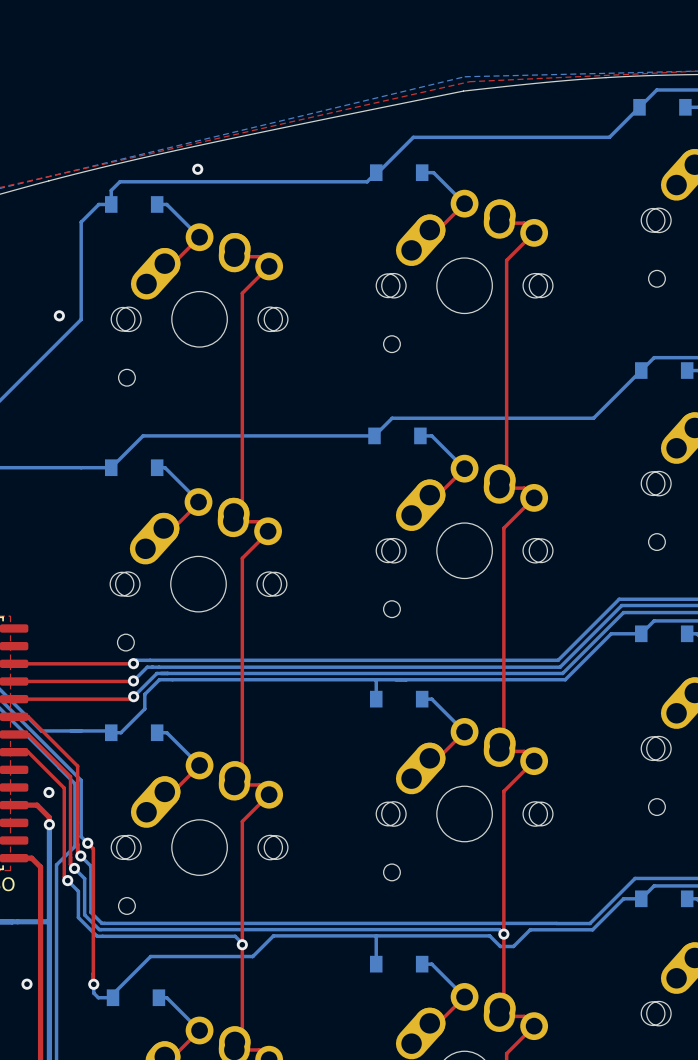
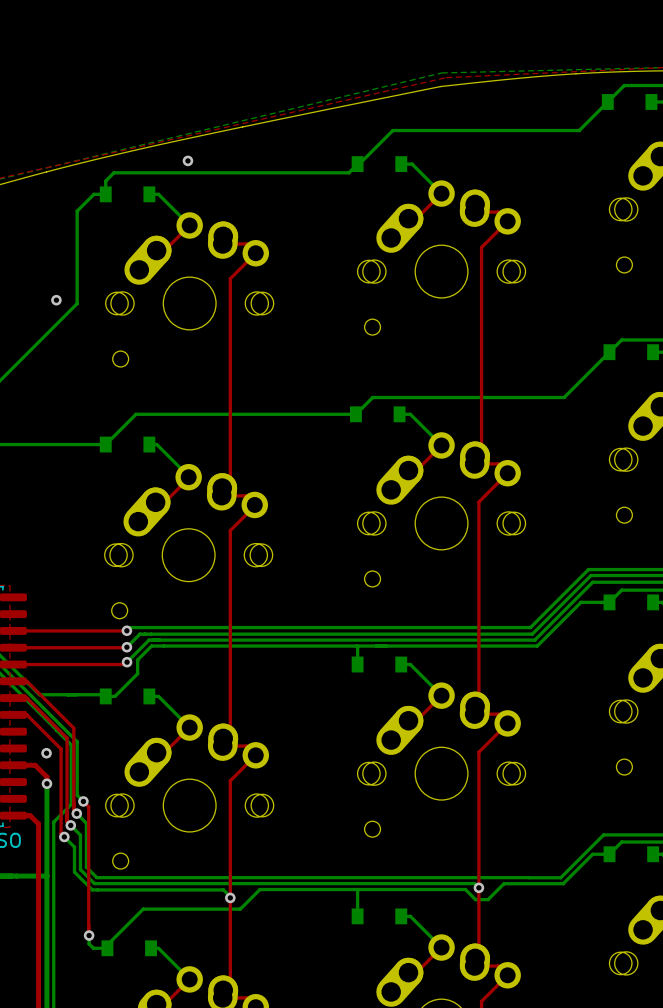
via: (27, 984) -> none

